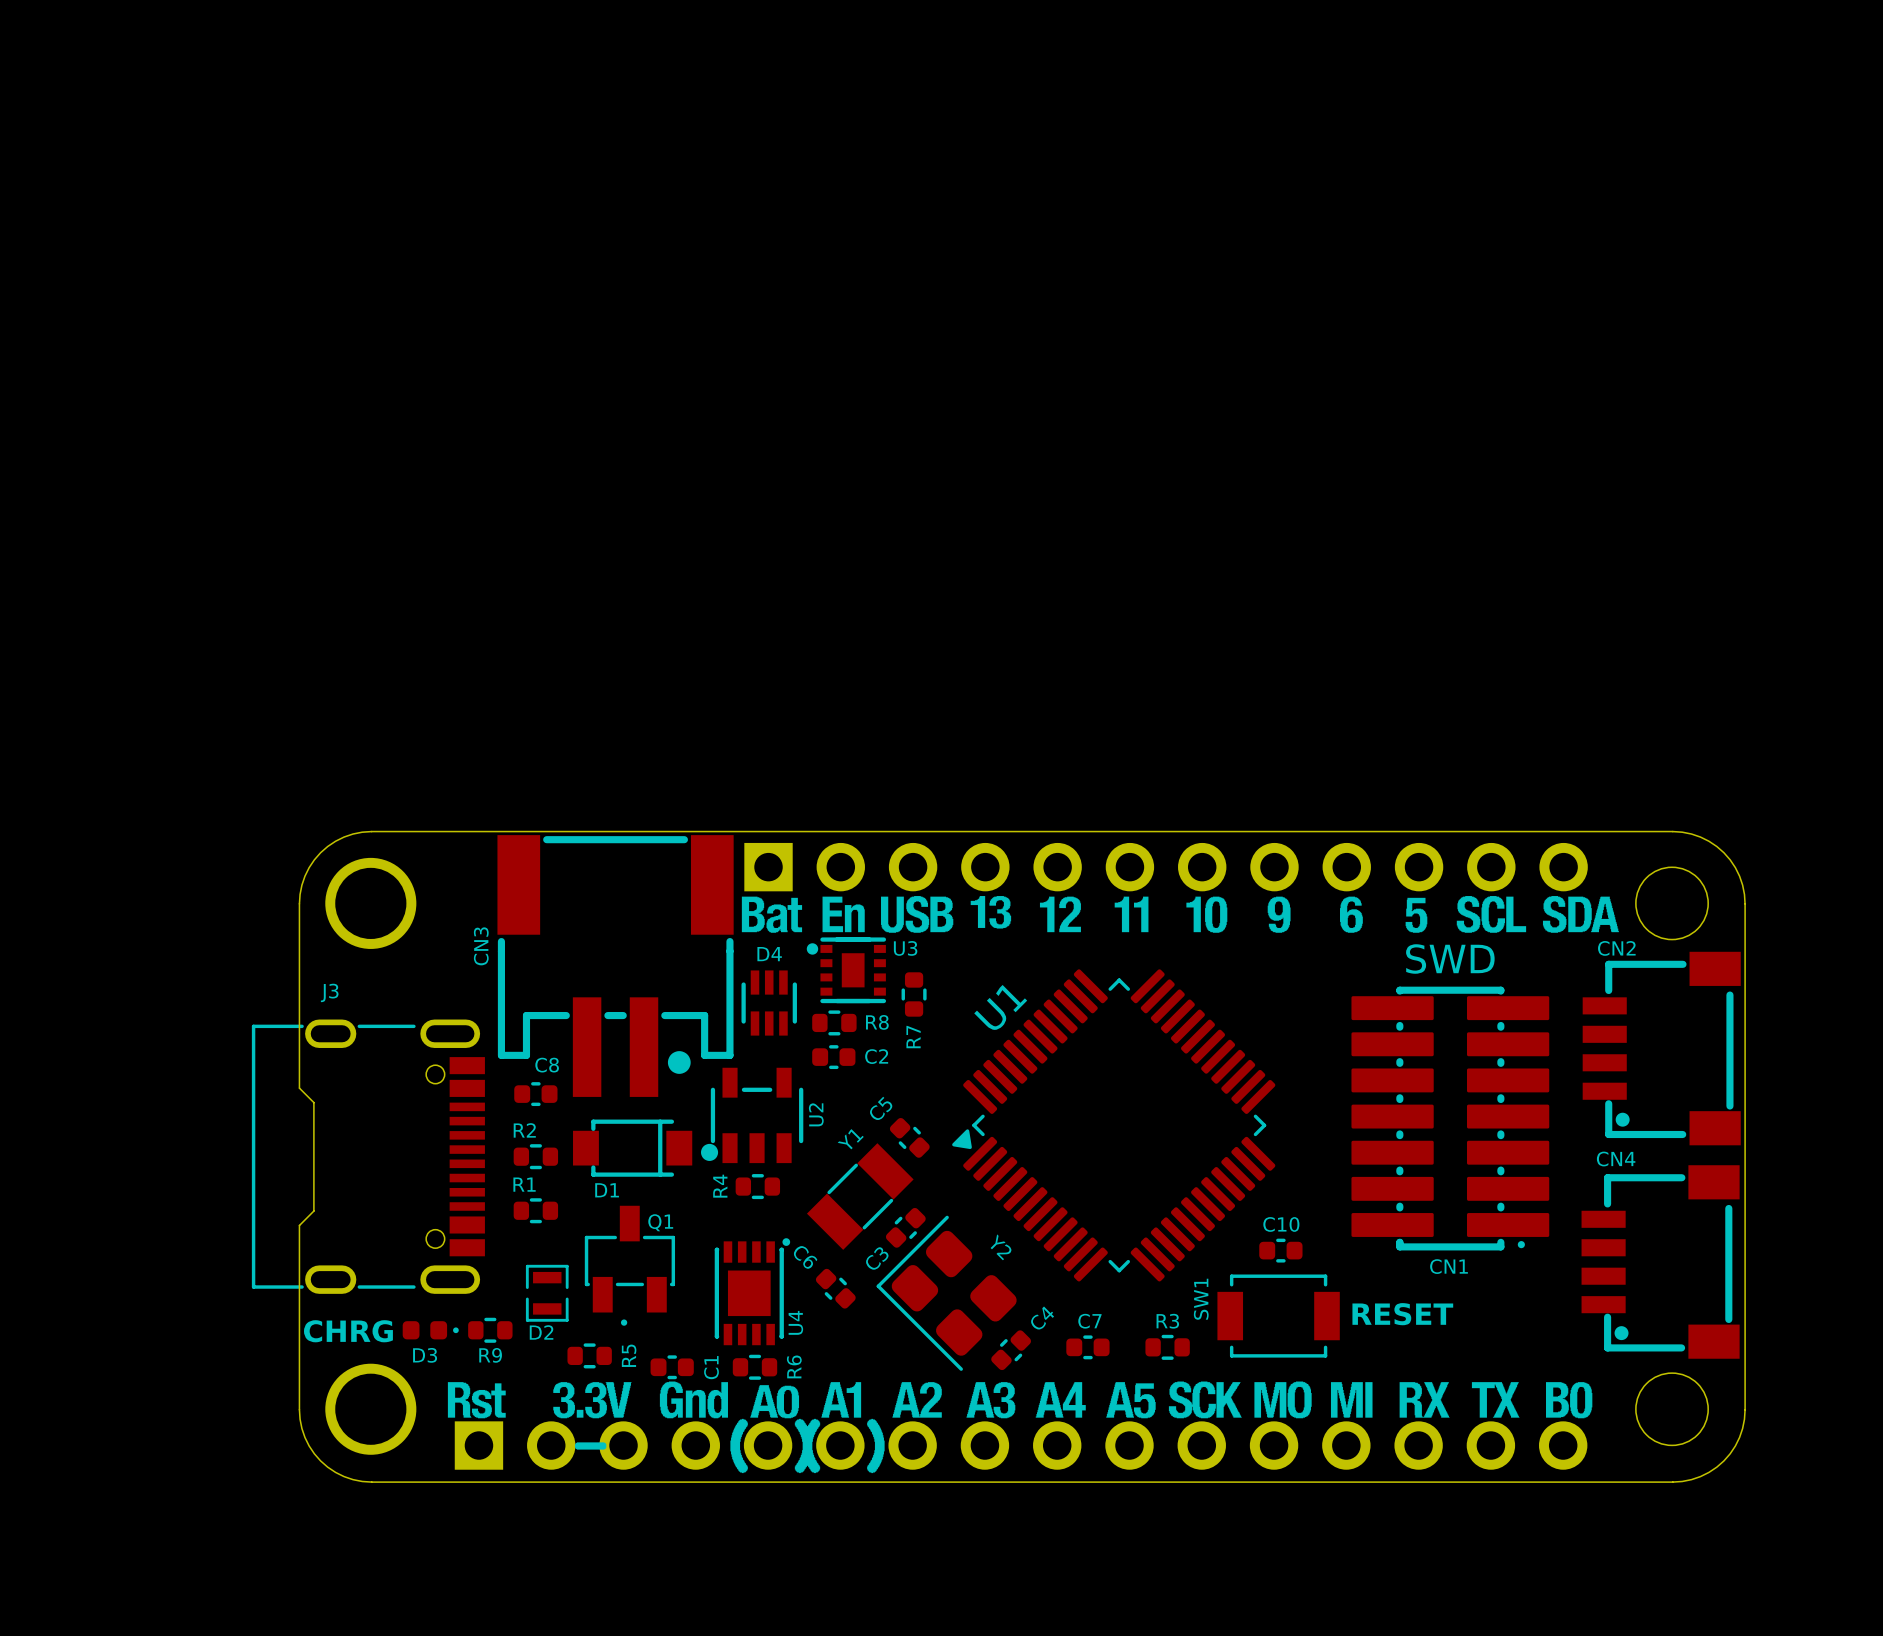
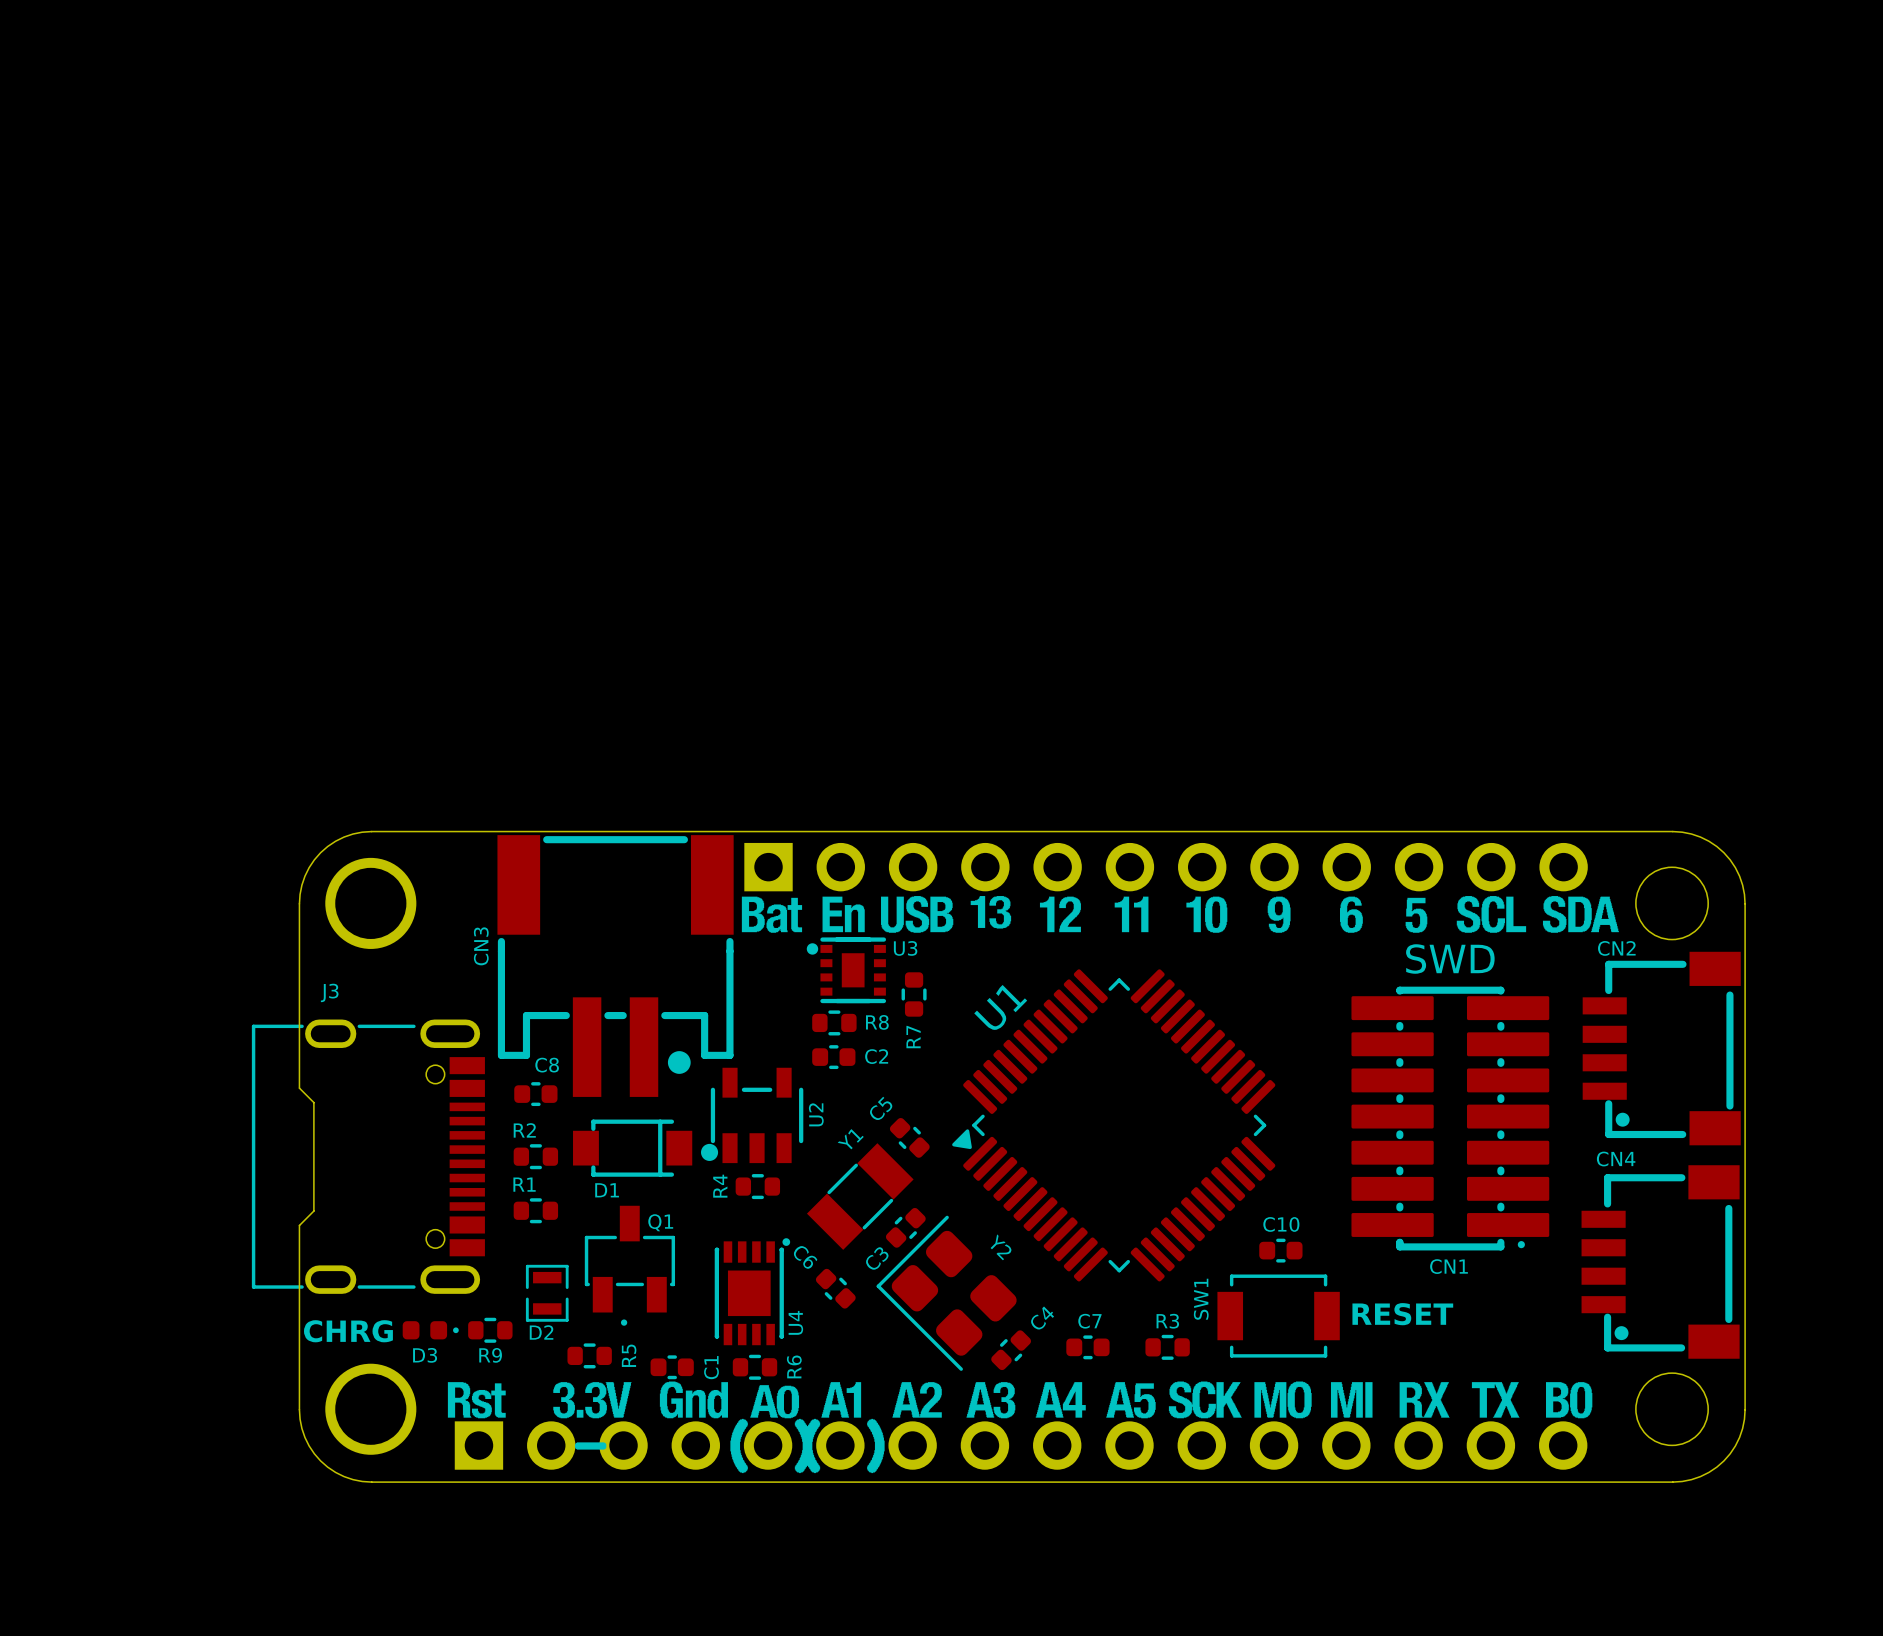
D4: (767, 1003) -> none

